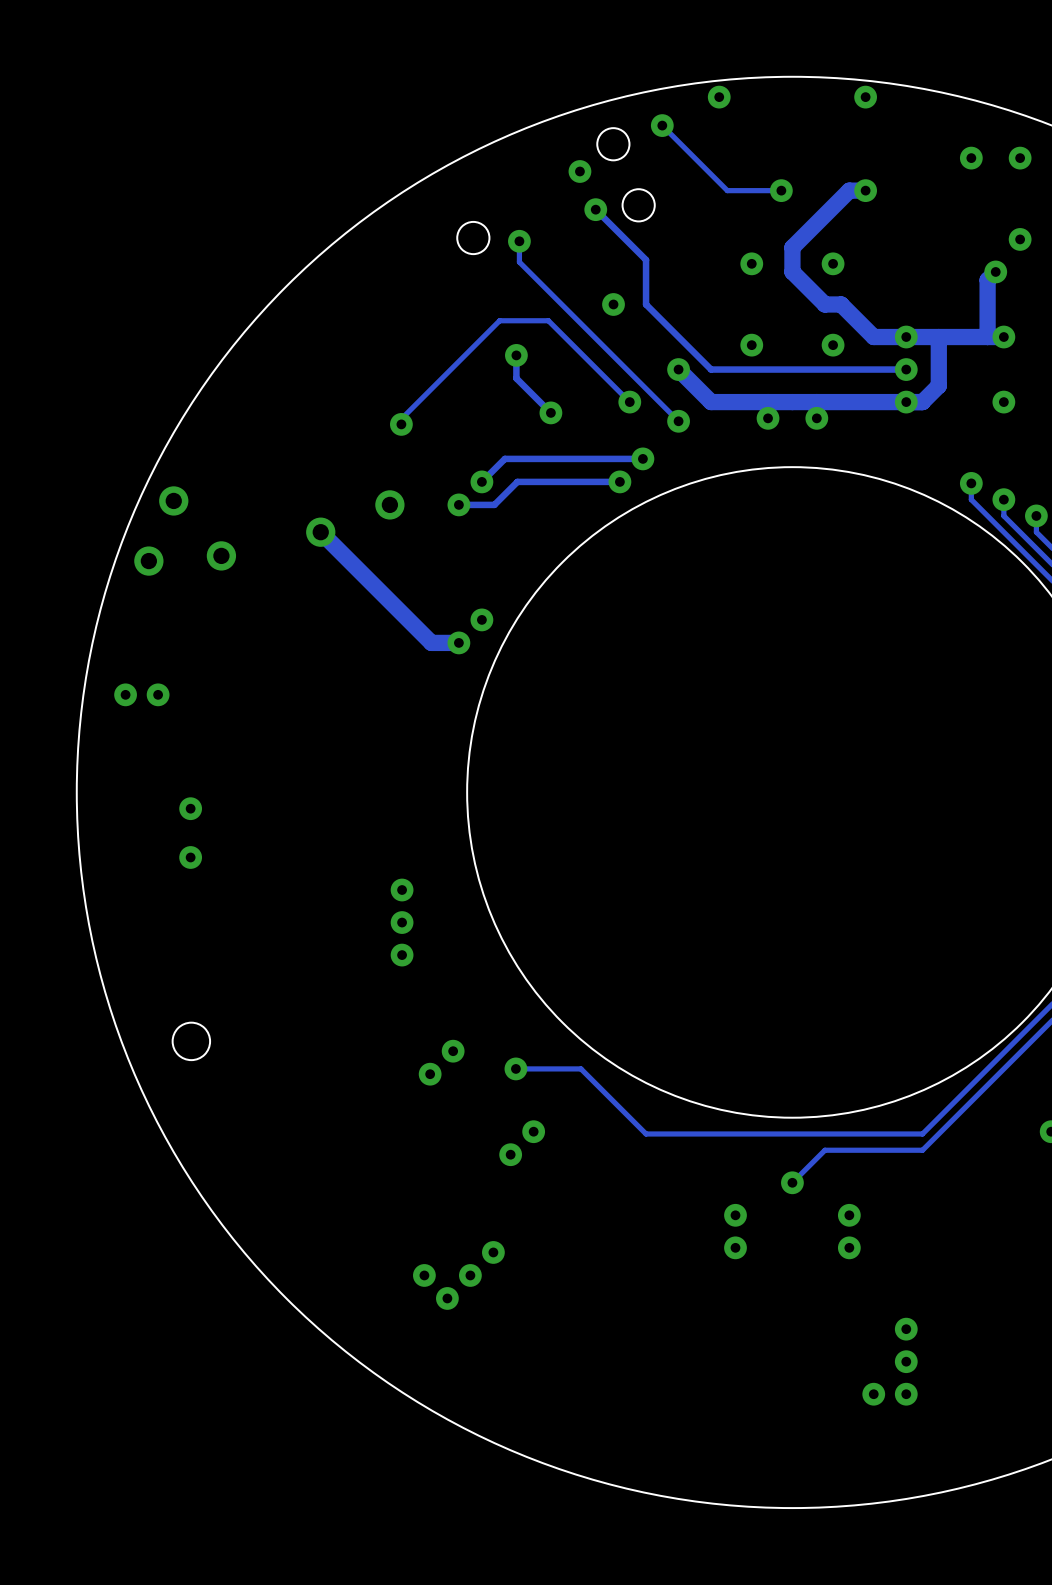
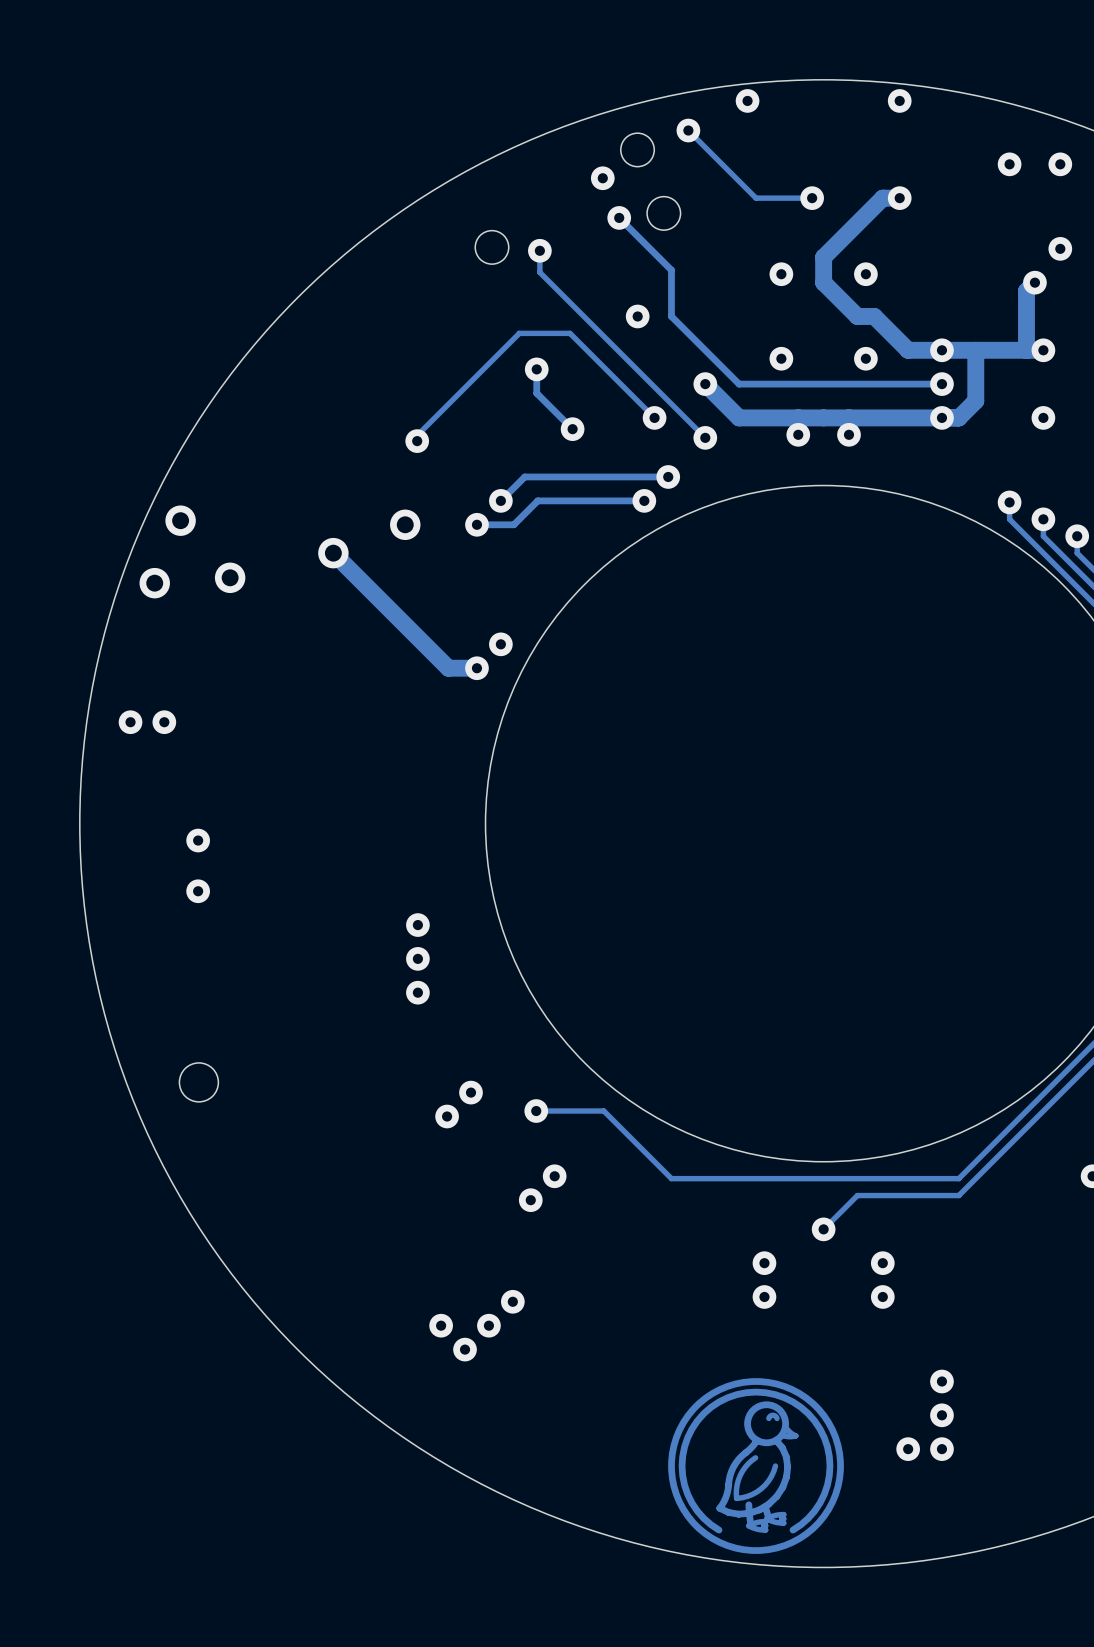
drawing: none -> [668, 1378, 844, 1554]

